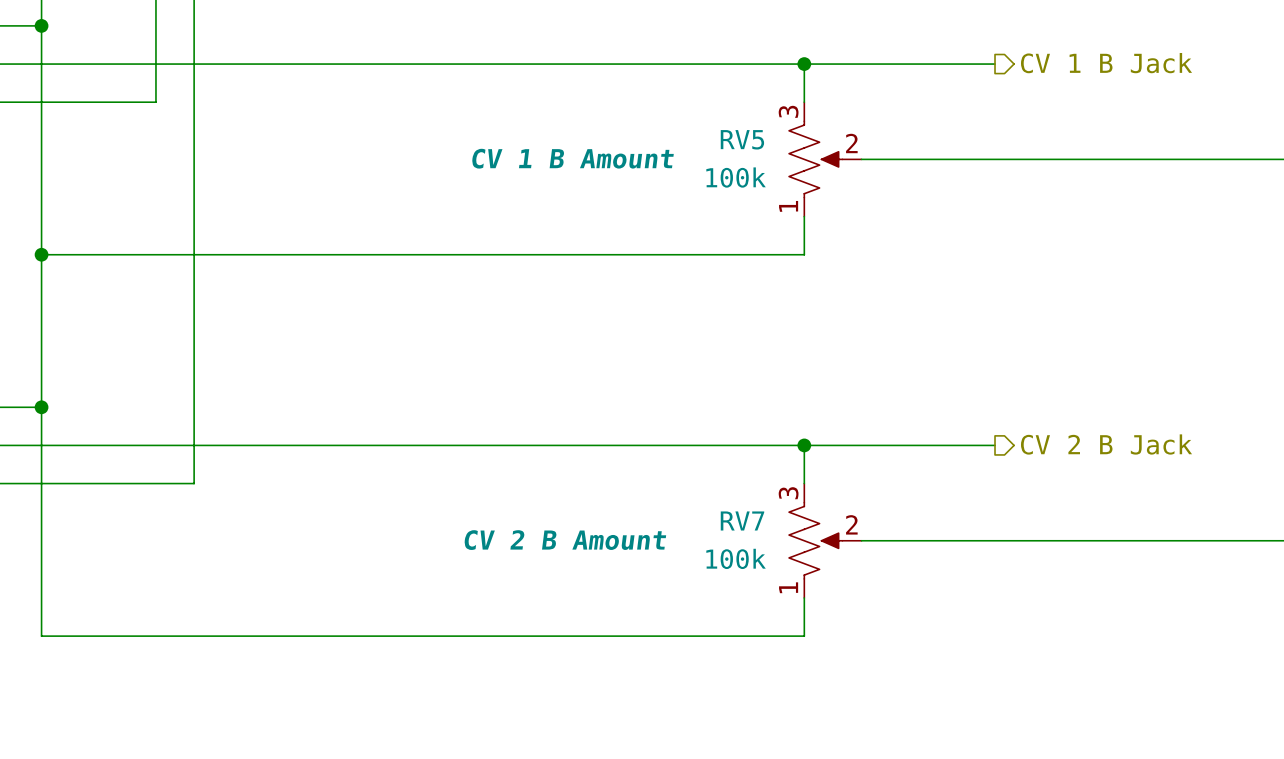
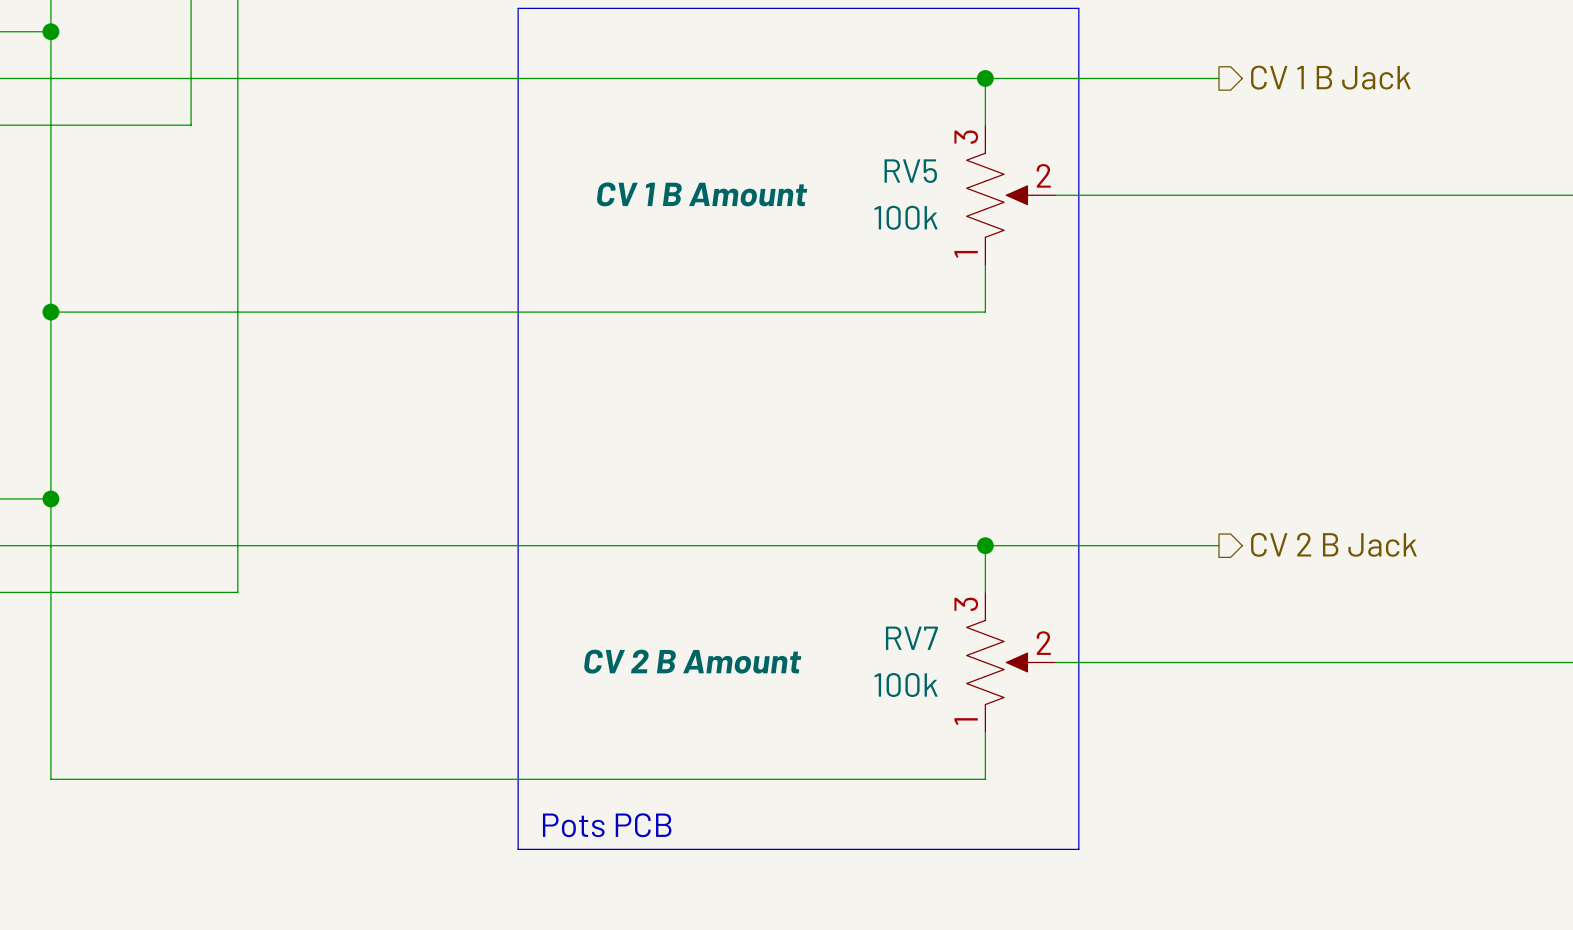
line: none -> (518, 8) (1078, 8) (1078, 849) (518, 849) (518, 8)
text: none -> Pots PCB (607, 825)

